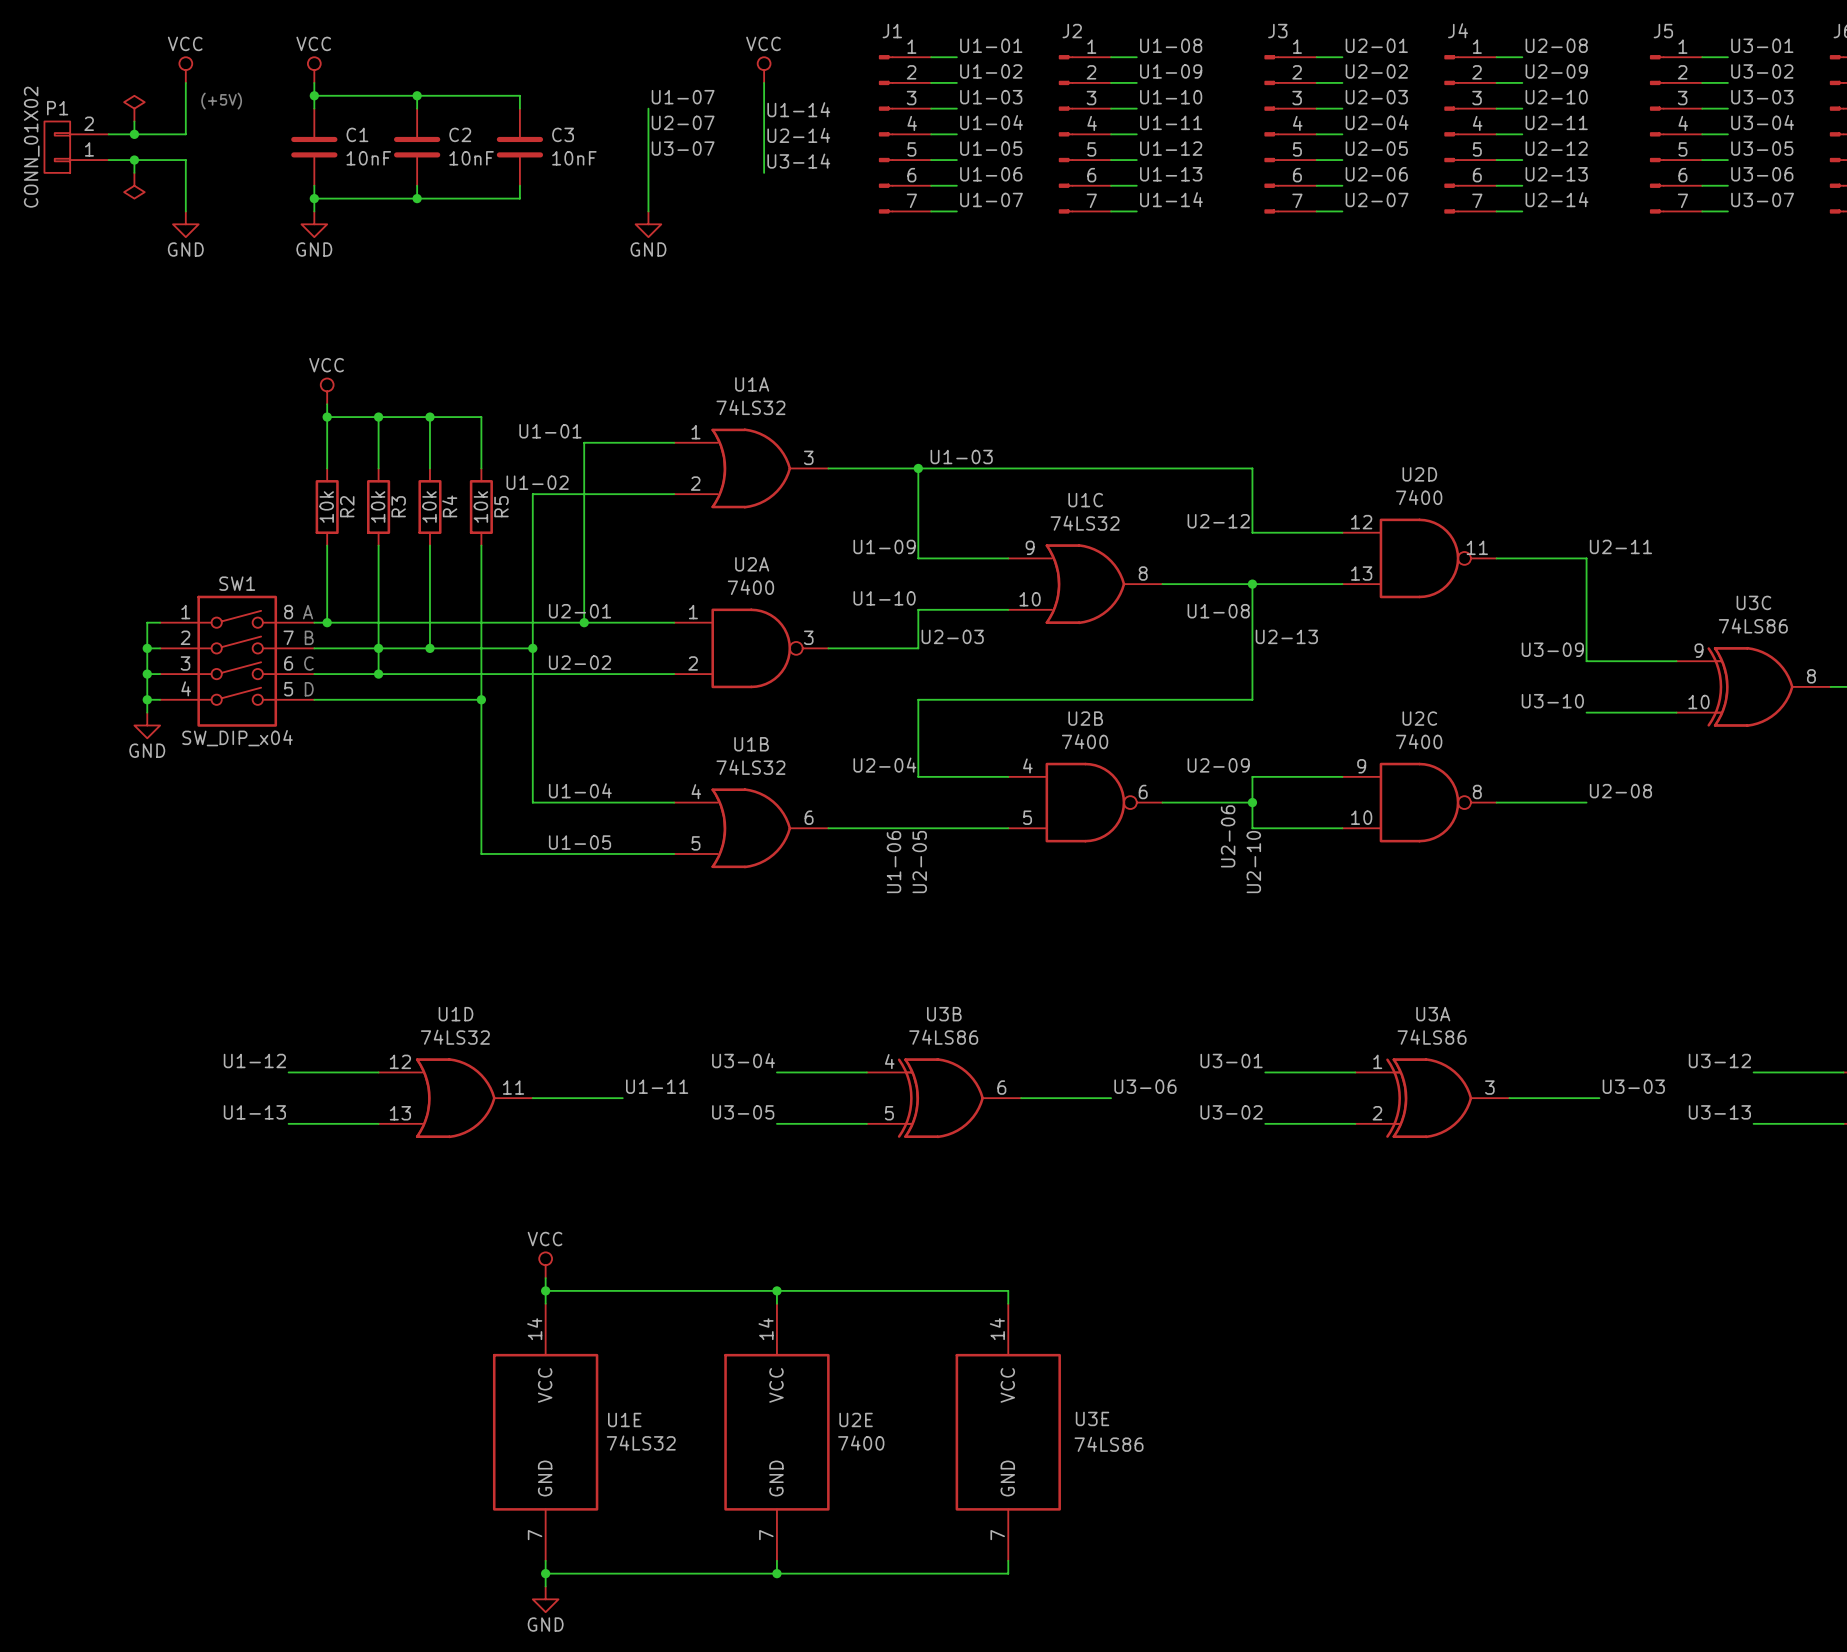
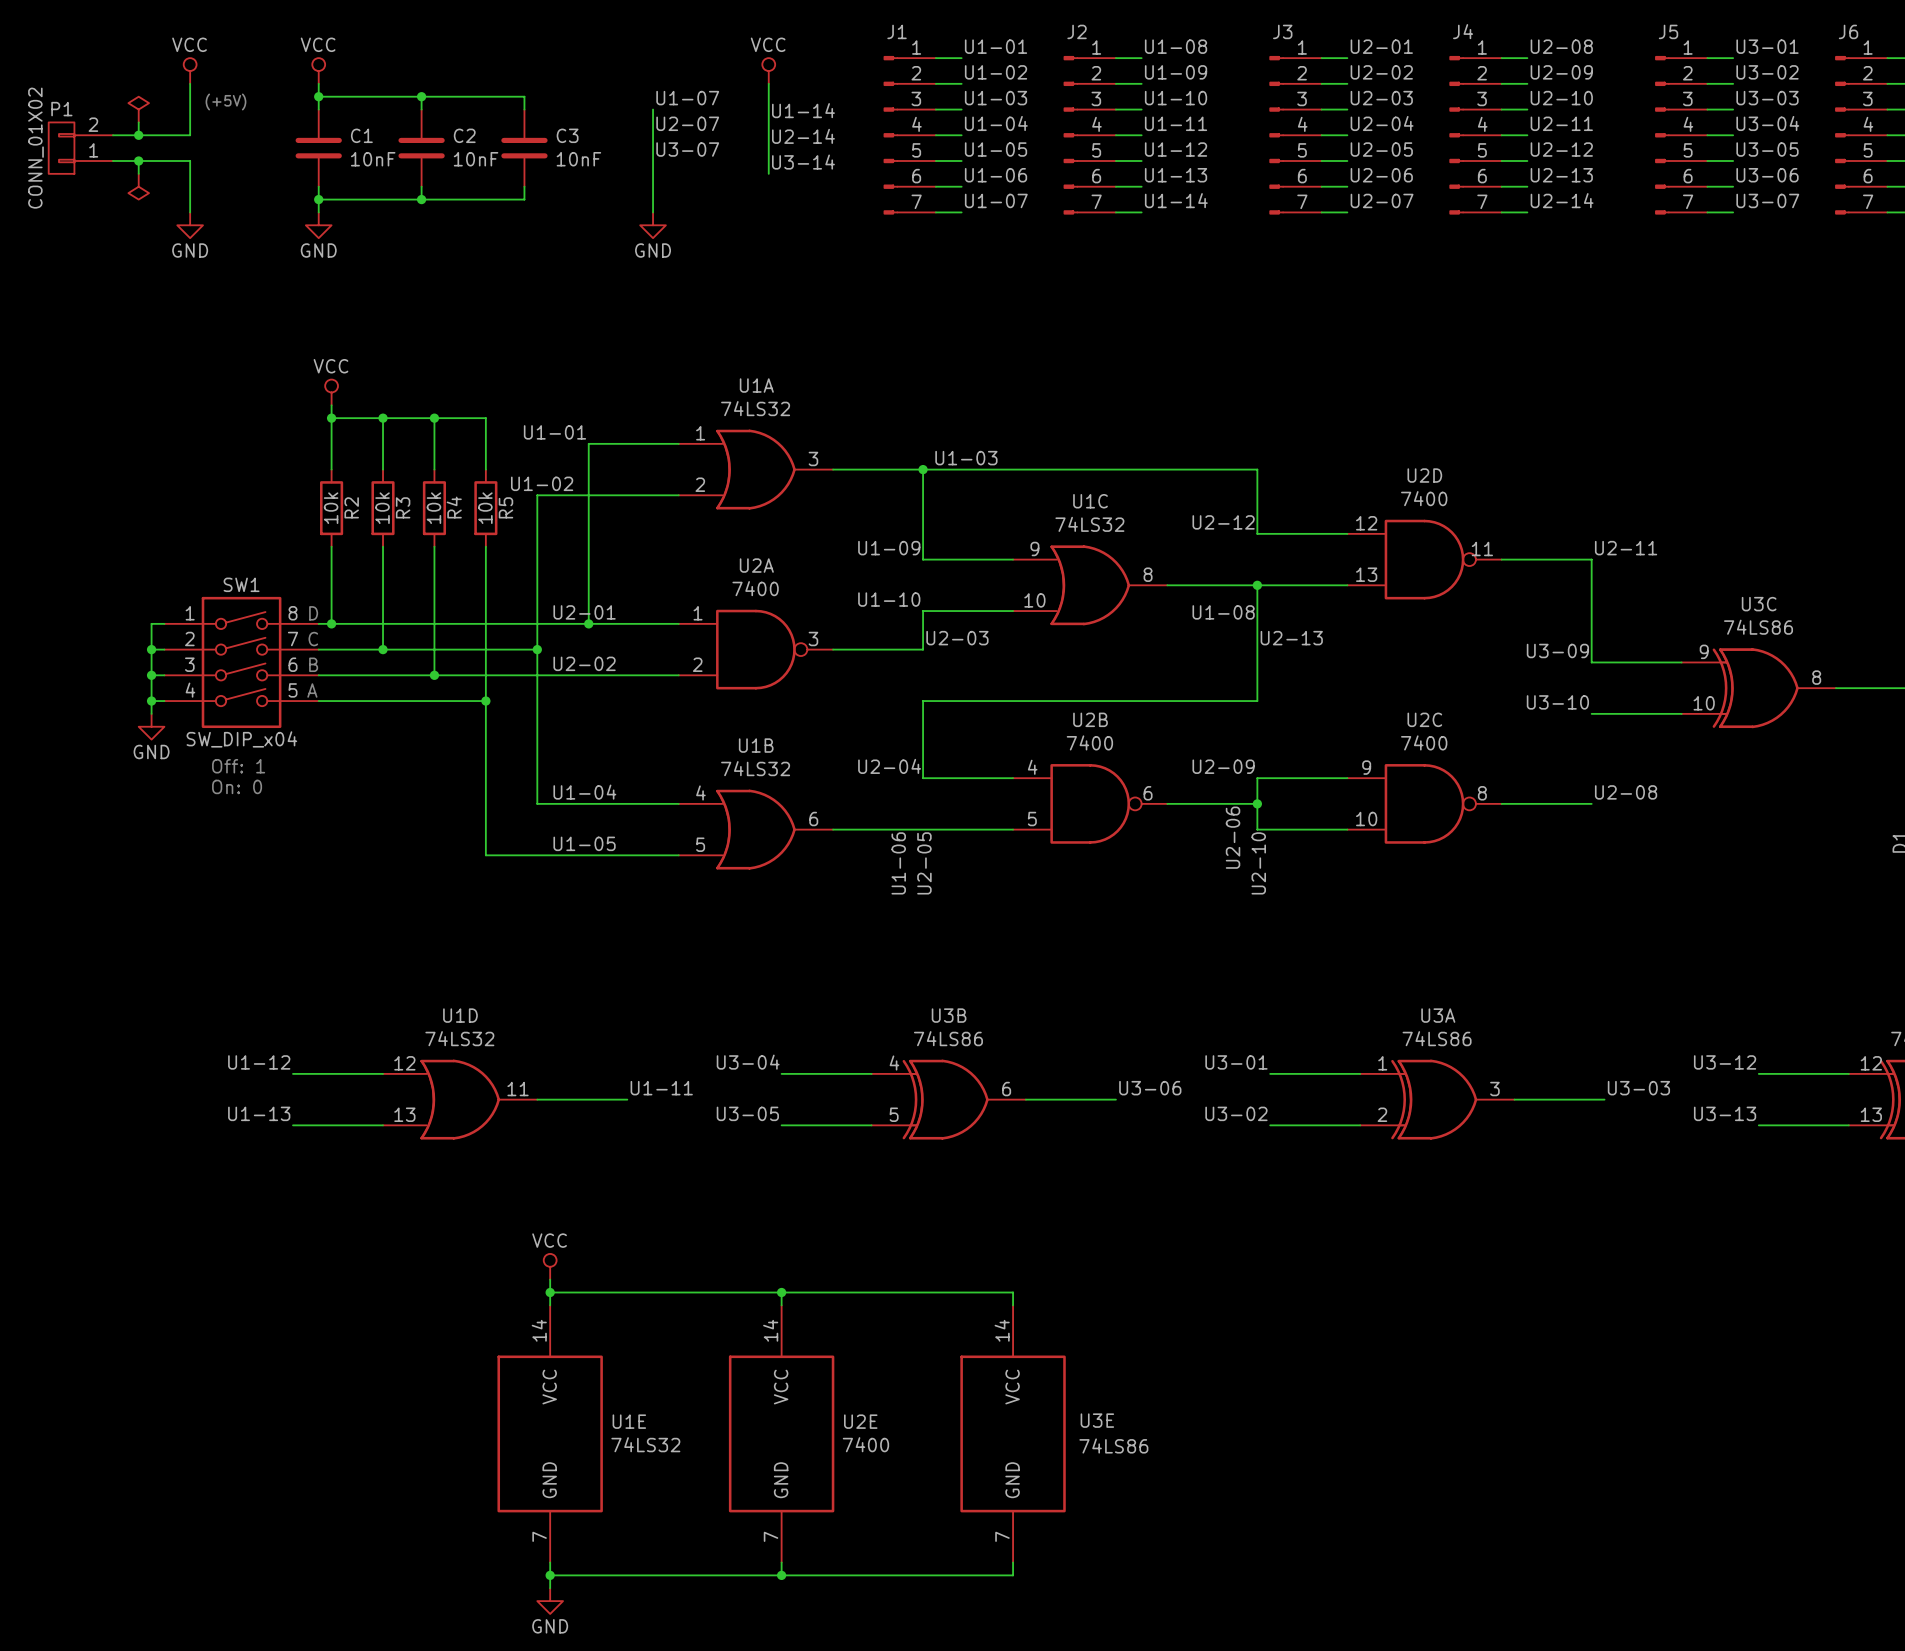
text: A (308, 612) -> D (313, 613)
text: B (309, 637) -> C (313, 639)
wire: (378, 648) (378, 674) -> (434, 649) (434, 675)
junction: (429, 648) -> none
text: C (308, 663) -> B (313, 664)
junction: (378, 674) -> none
junction: none -> (434, 675)
text: D (309, 689) -> A (312, 690)
text: none -> Off: 1 (238, 766)
text: none -> On: 0 (237, 786)

